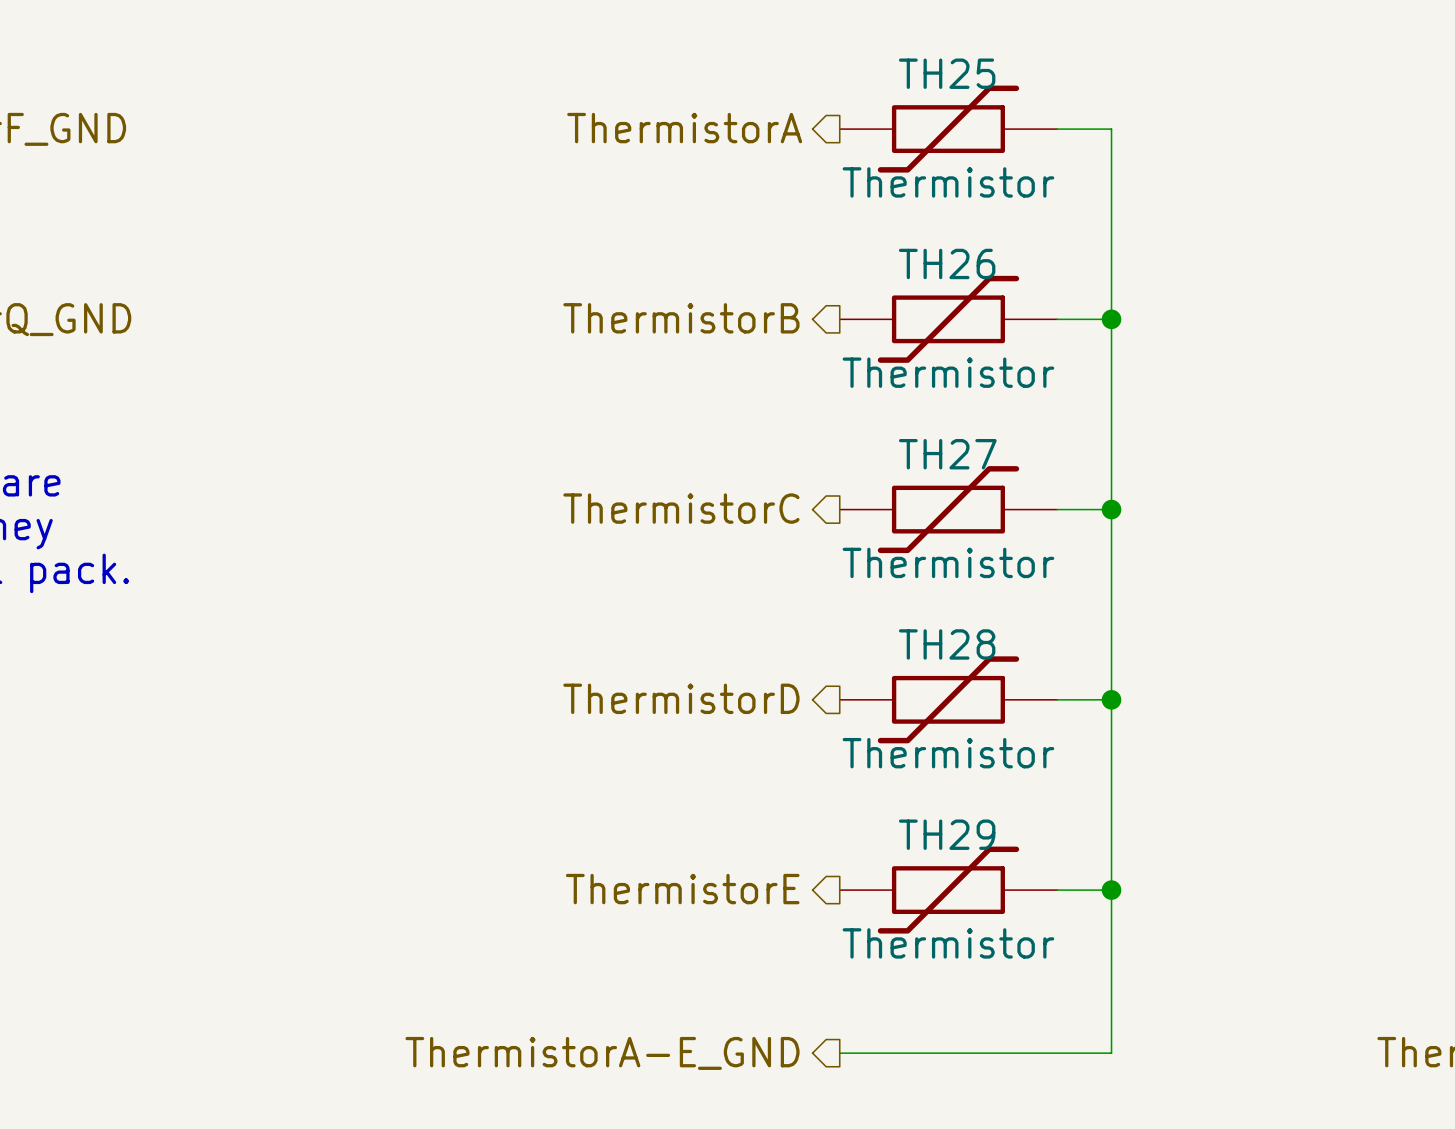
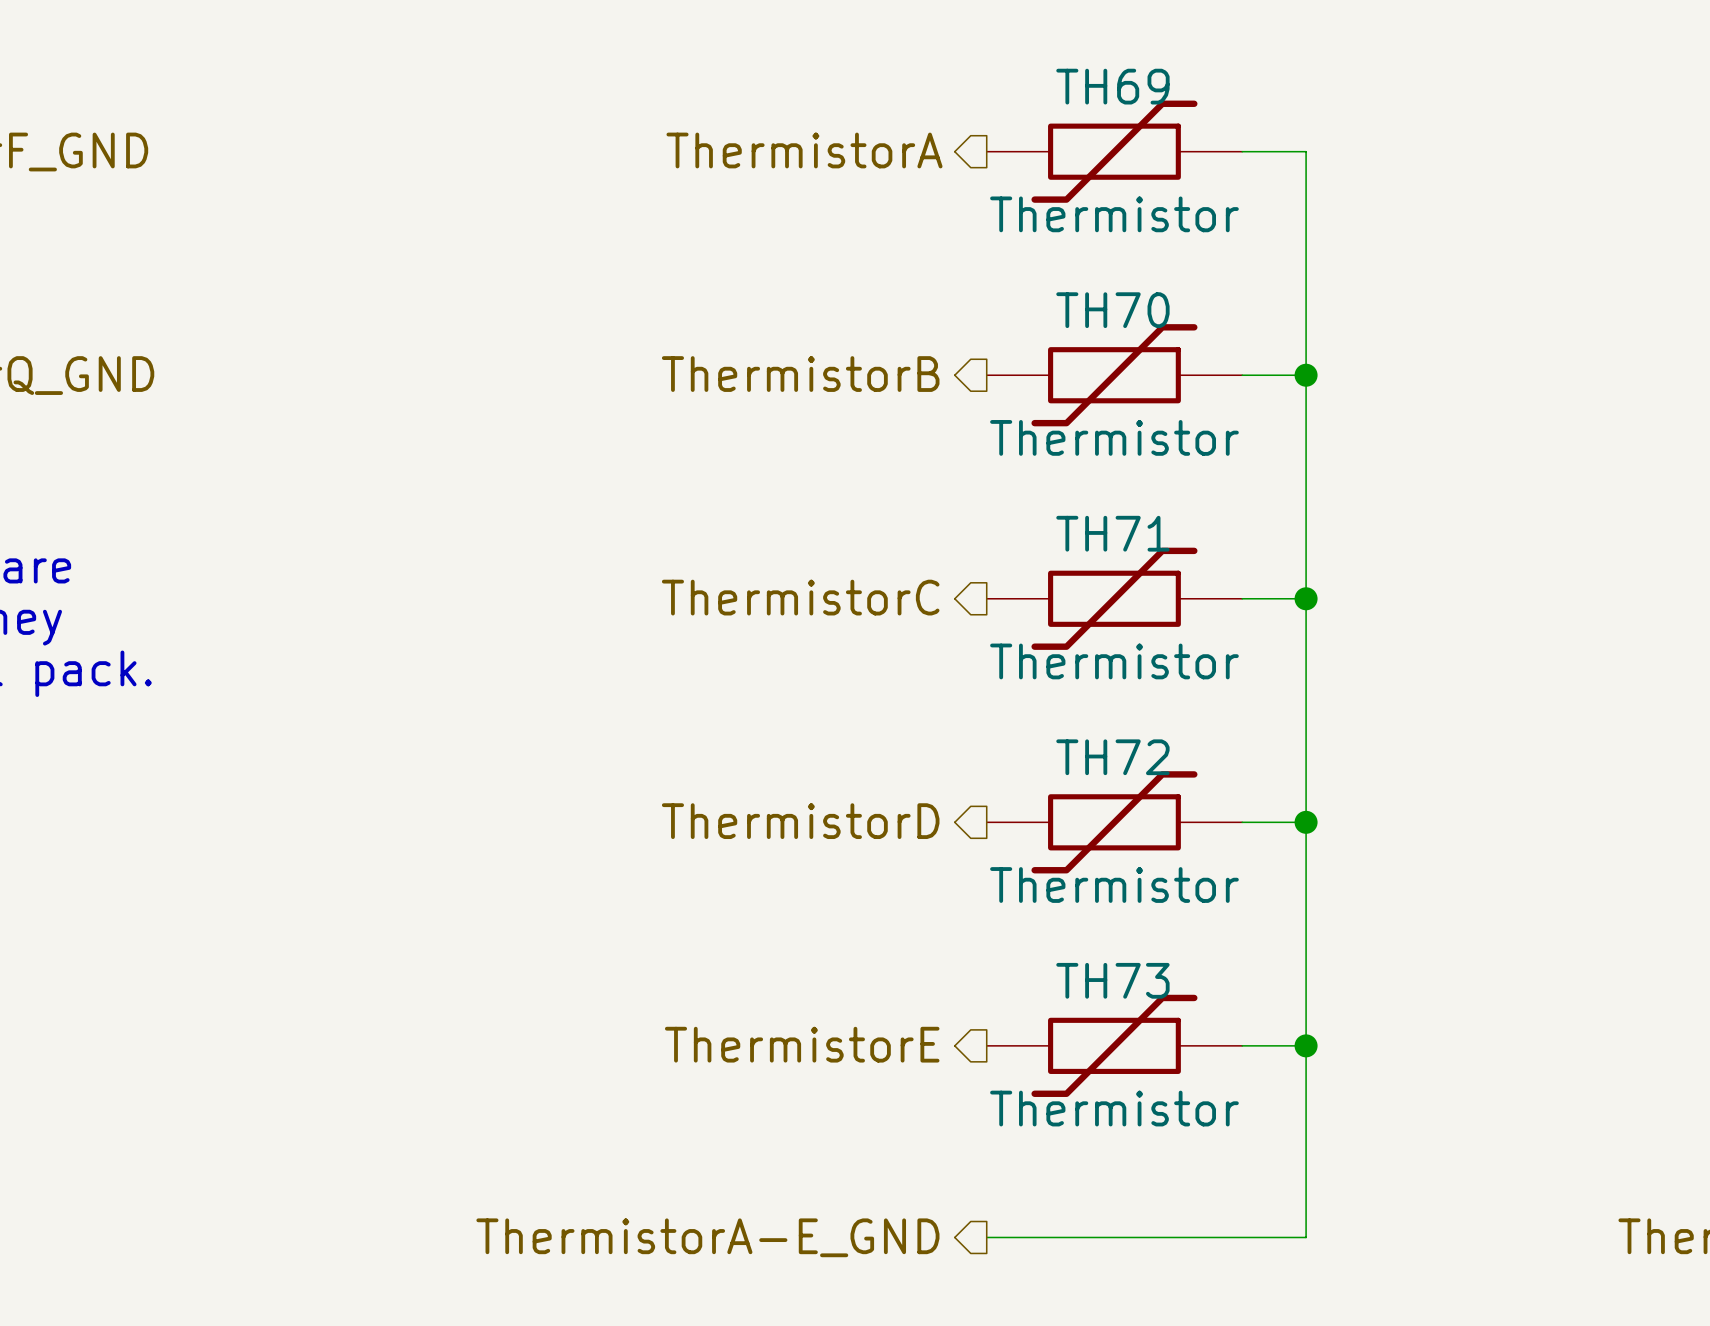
TH25 name: TH25 (947, 73) -> TH69 (1112, 86)
TH26 name: TH26 (947, 263) -> TH70 (1112, 310)
TH27 name: TH27 (947, 454) -> TH71 (1112, 533)
TH28 name: TH28 (947, 644) -> TH72 (1112, 757)
TH29 name: TH29 (947, 834) -> TH73 (1112, 980)

